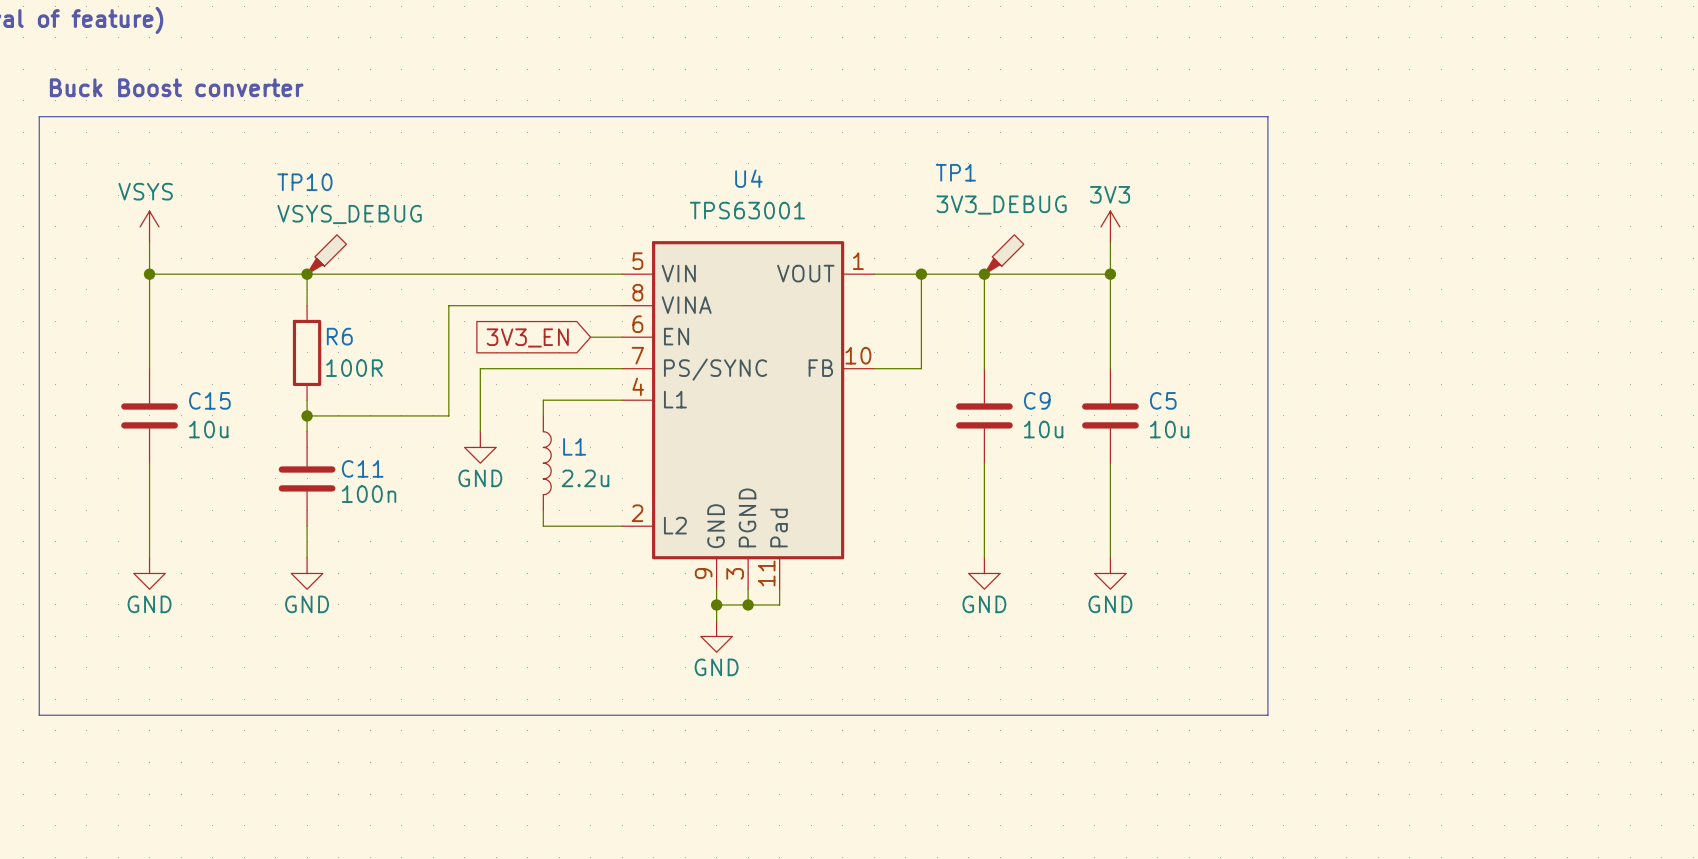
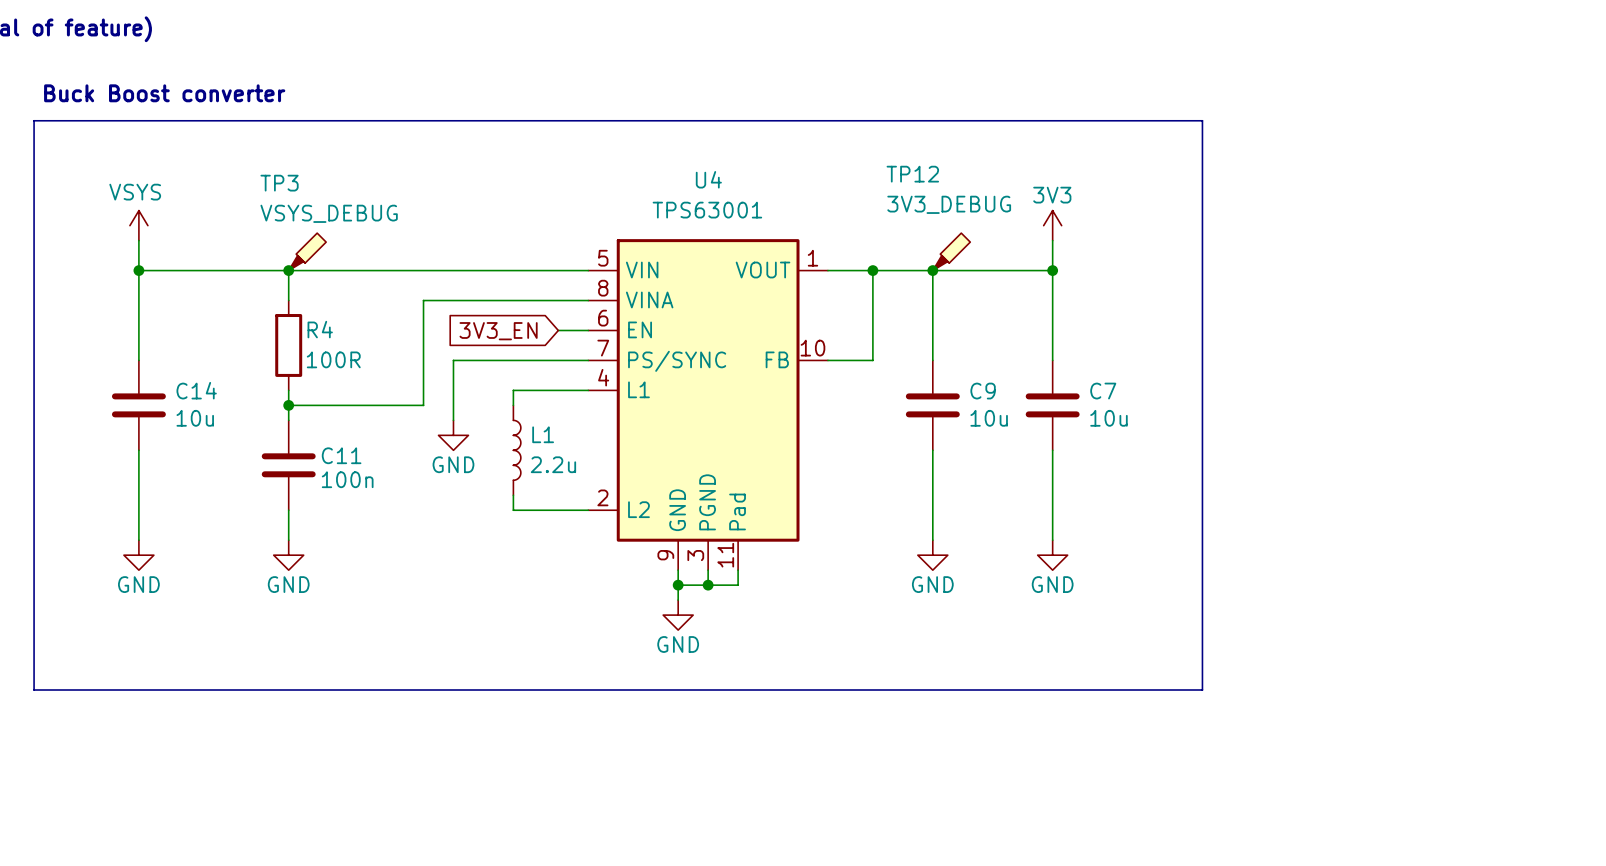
TP1 name: TP1 (955, 172) -> TP12 (912, 174)
TP10 name: TP10 (304, 182) -> TP3 (279, 183)
R6 name: R6 (339, 336) -> R4 (320, 329)
C15 name: C15 (209, 400) -> C14 (196, 390)
C5 name: C5 (1163, 400) -> C7 (1103, 391)

